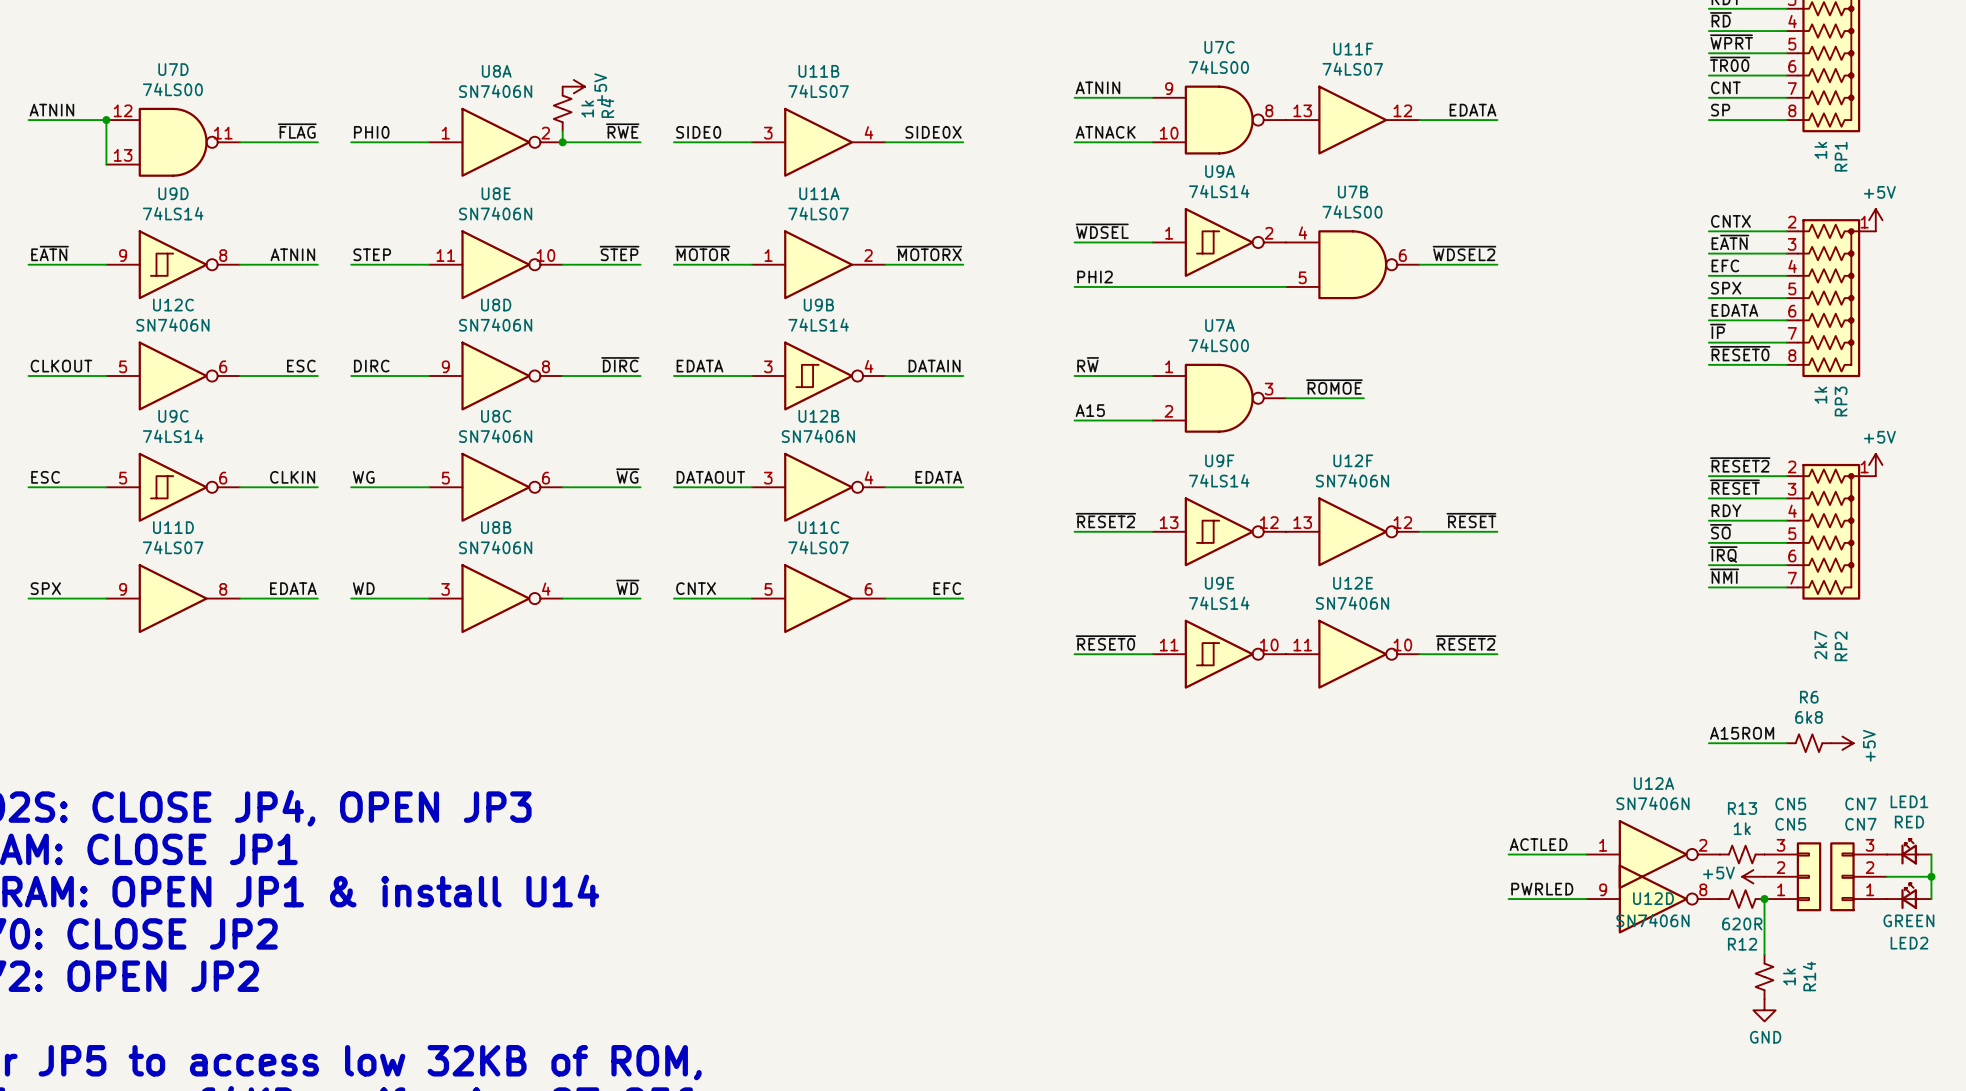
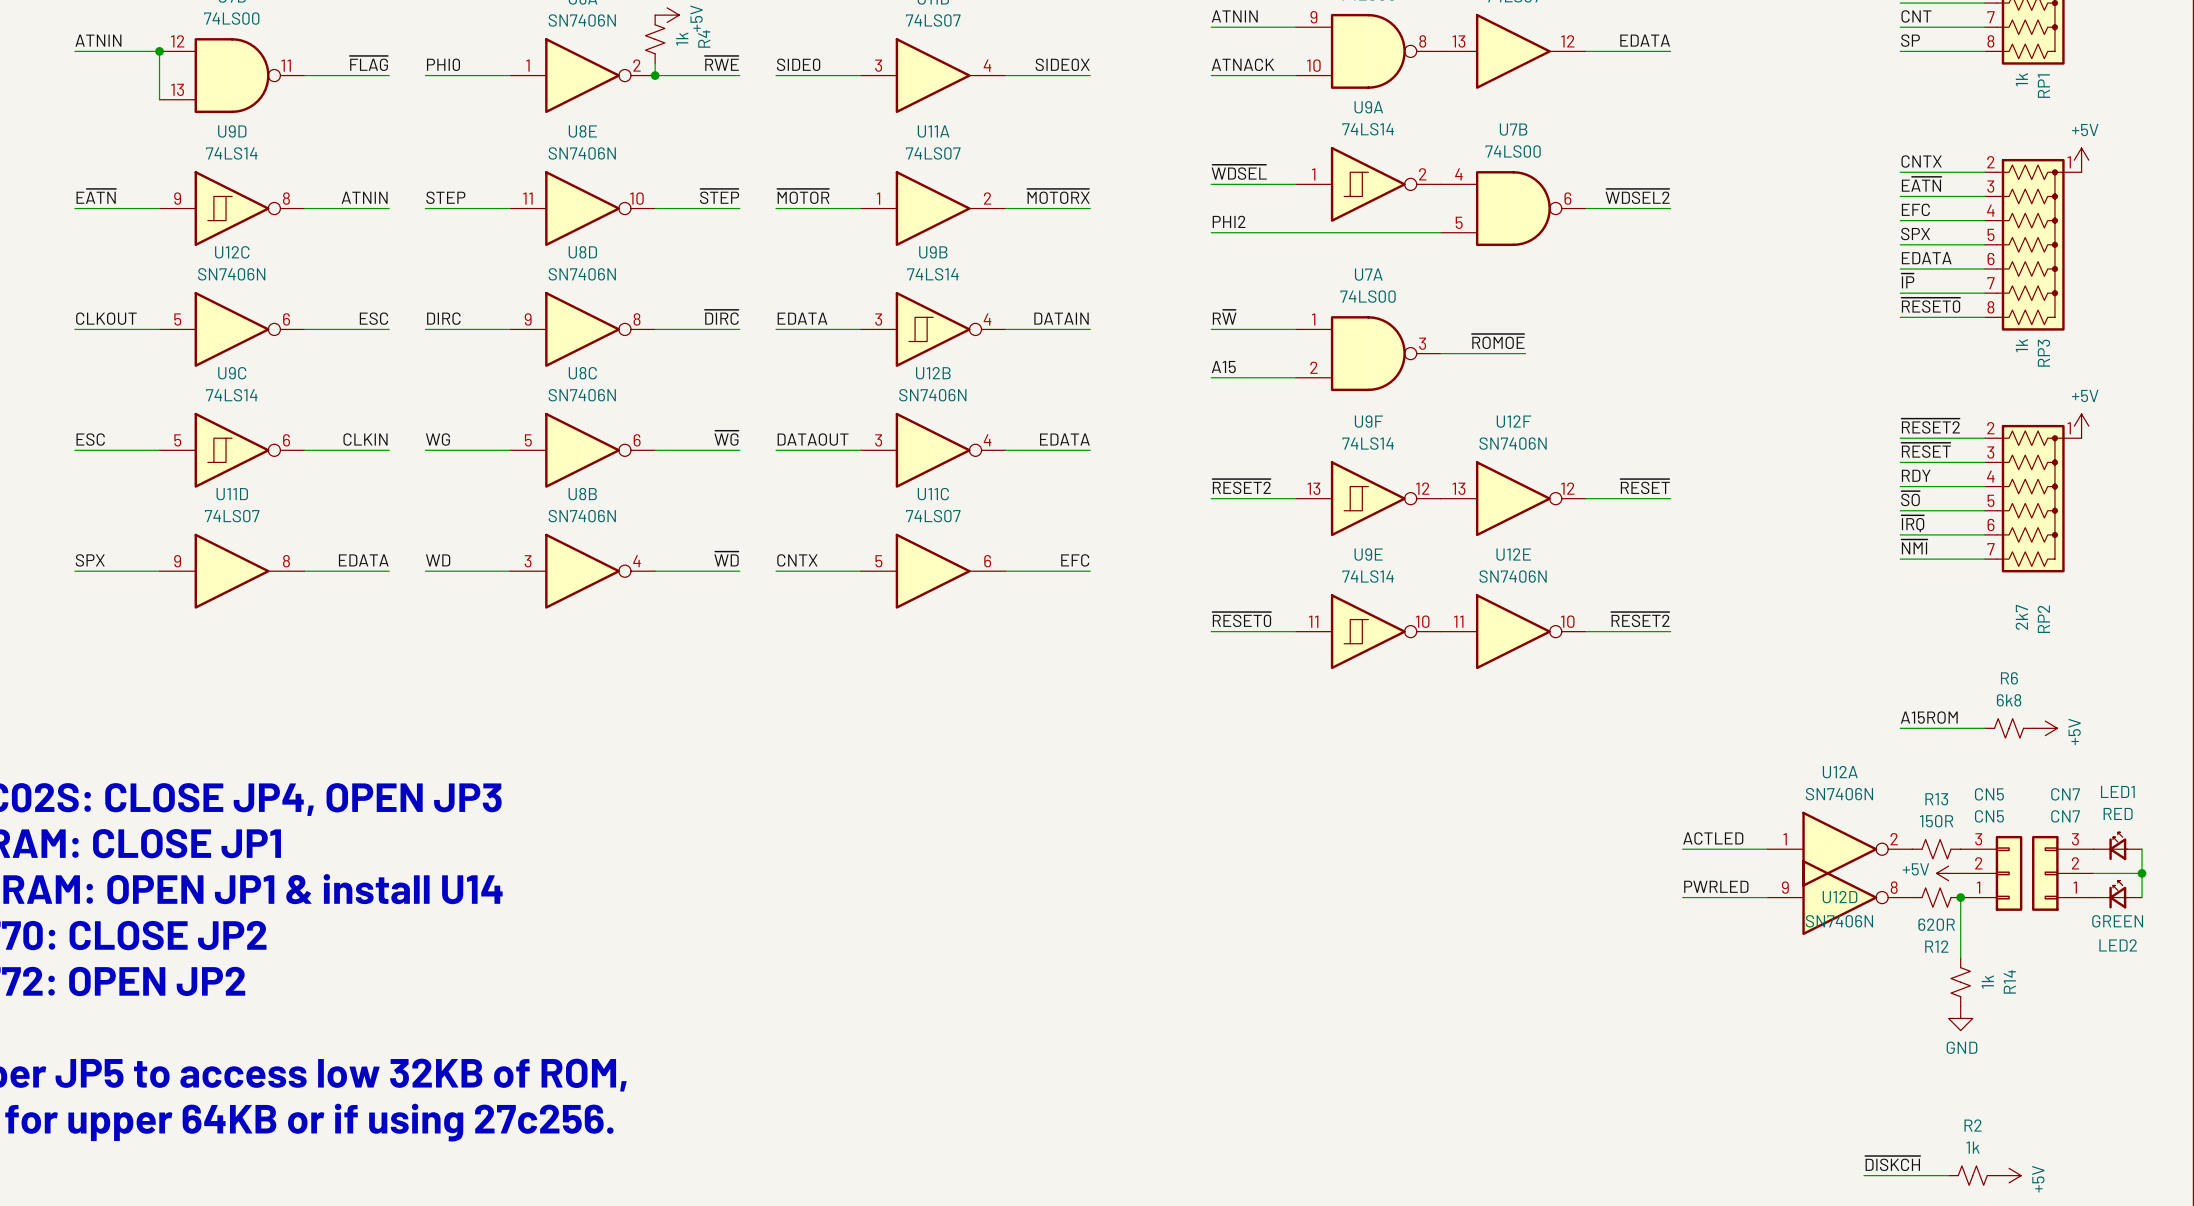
R13 value: 1k (1742, 828) -> 150R (1936, 821)

